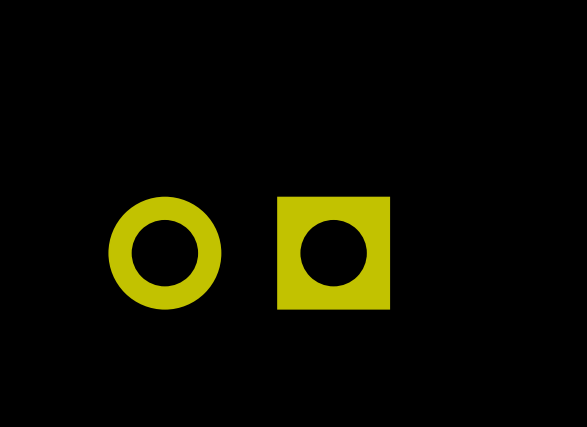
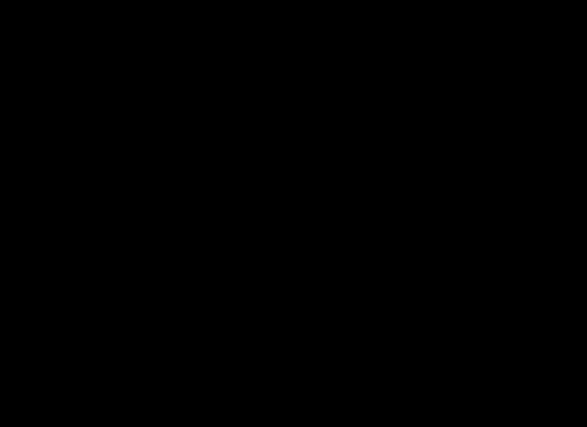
part: (249, 253) -> none

